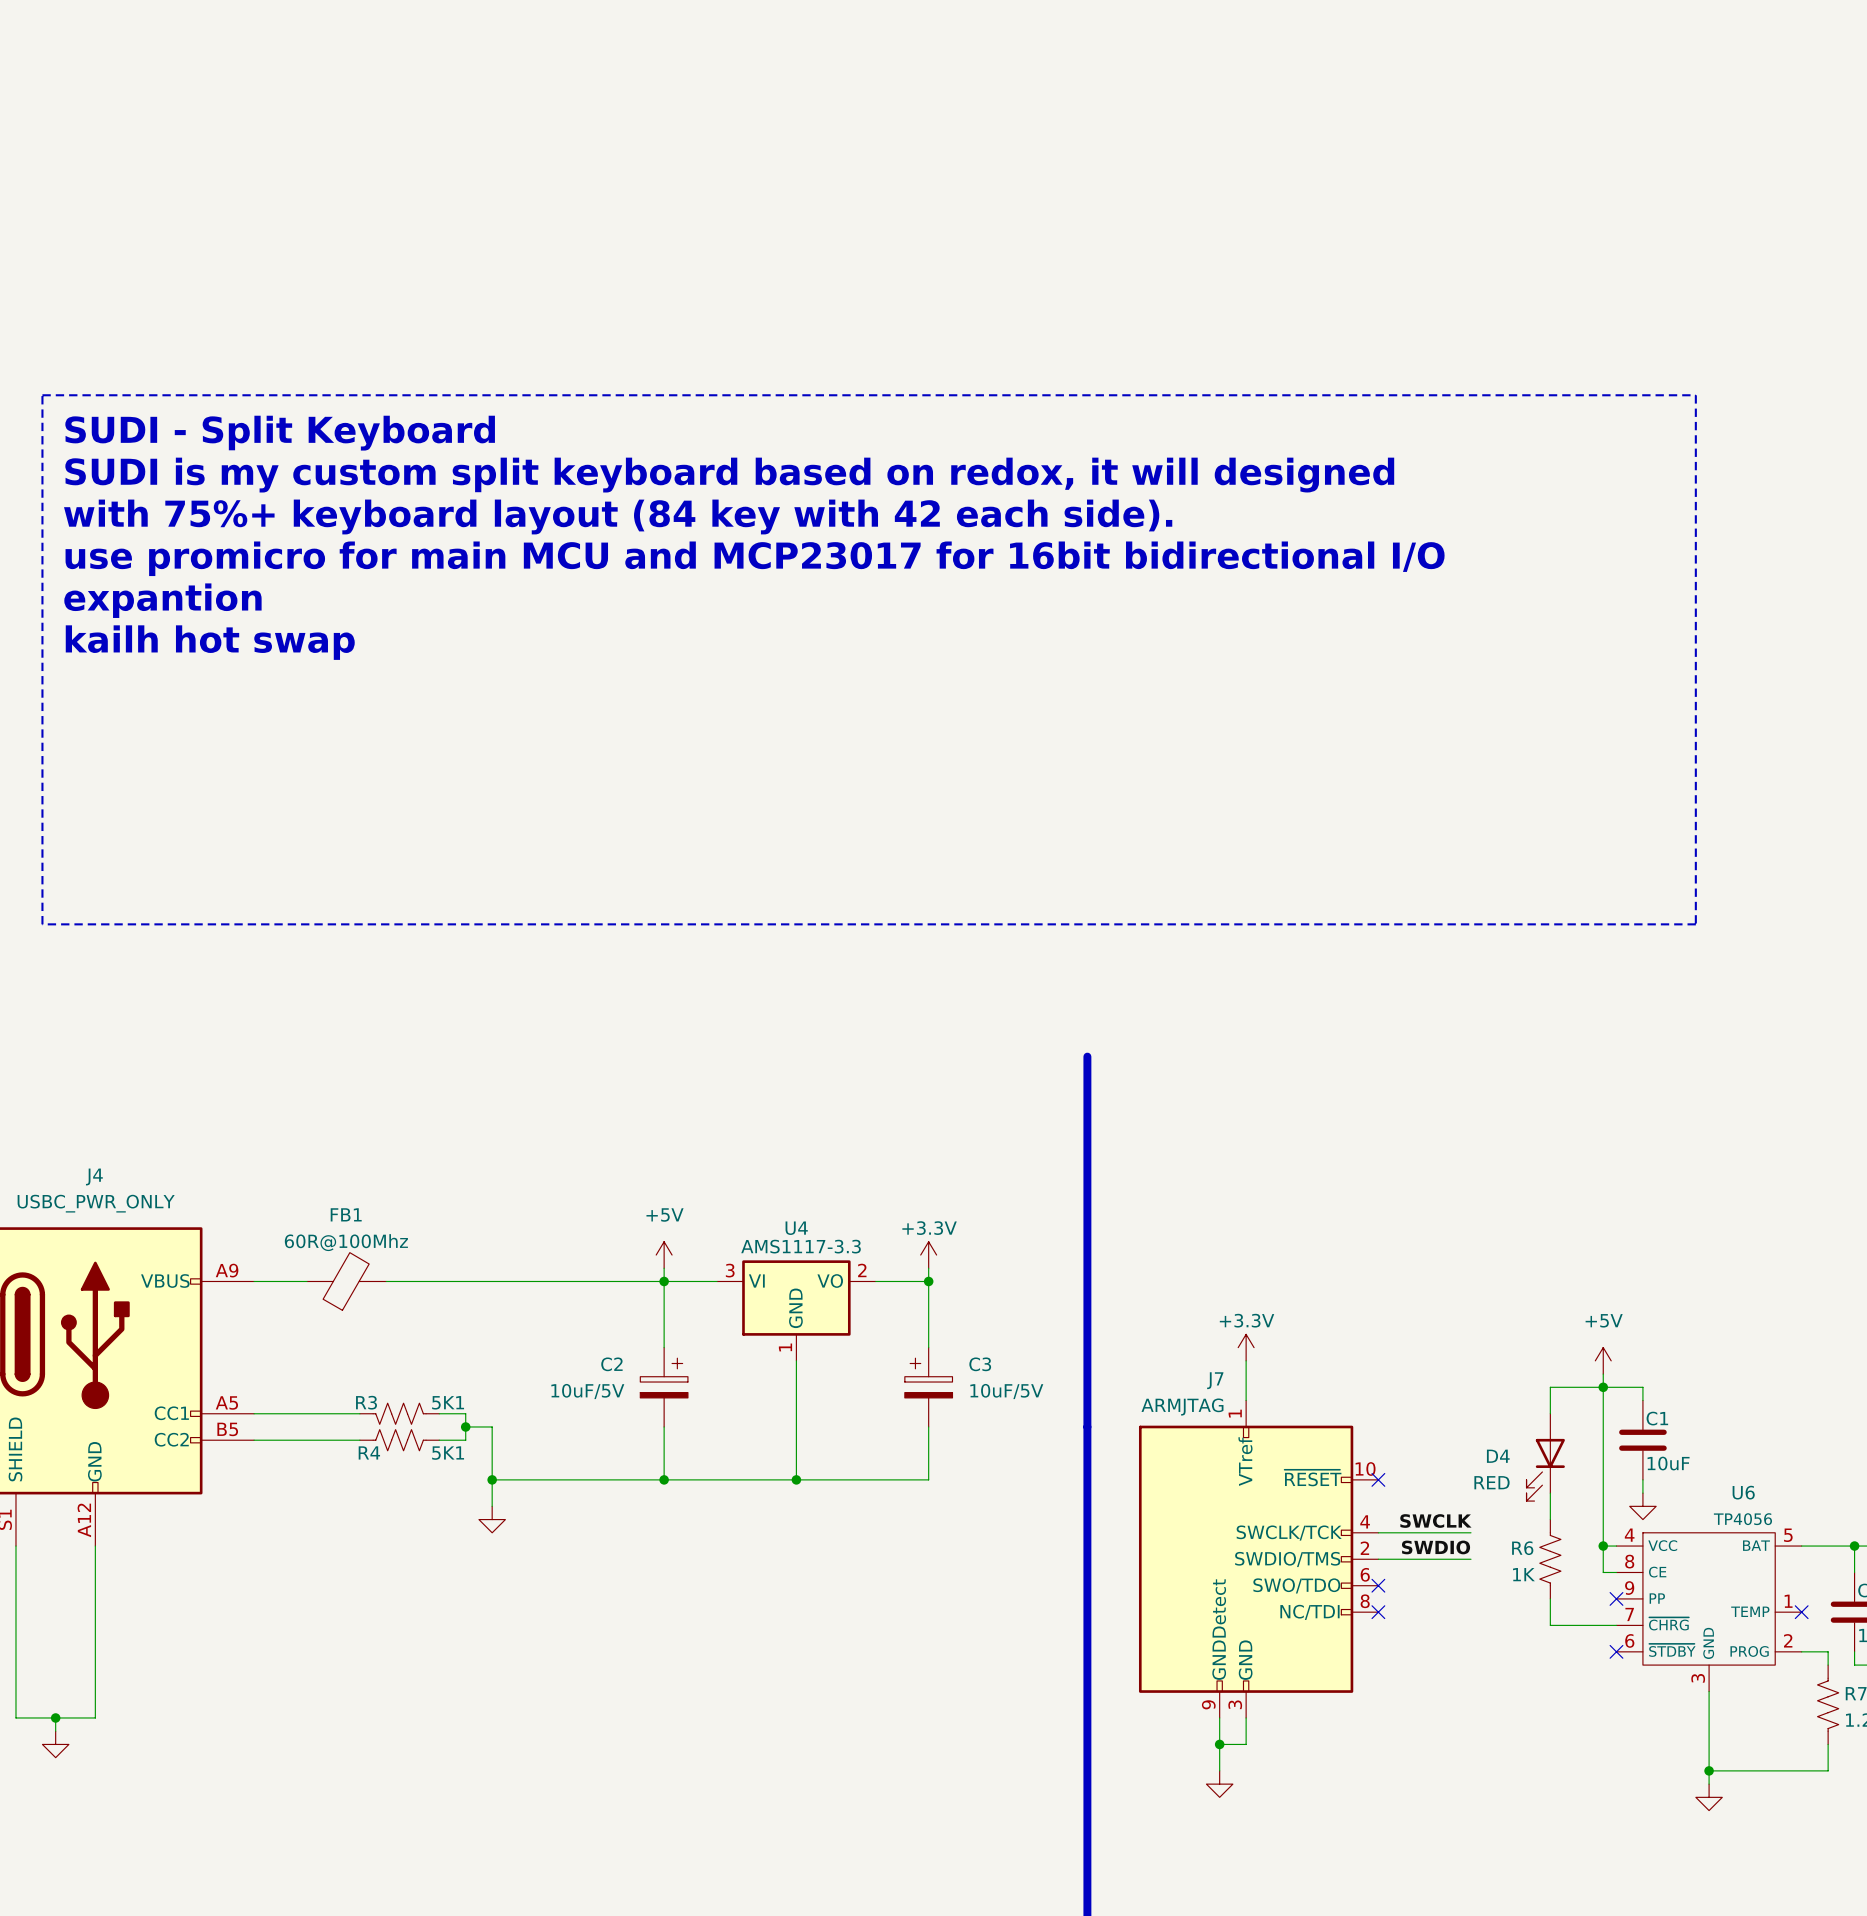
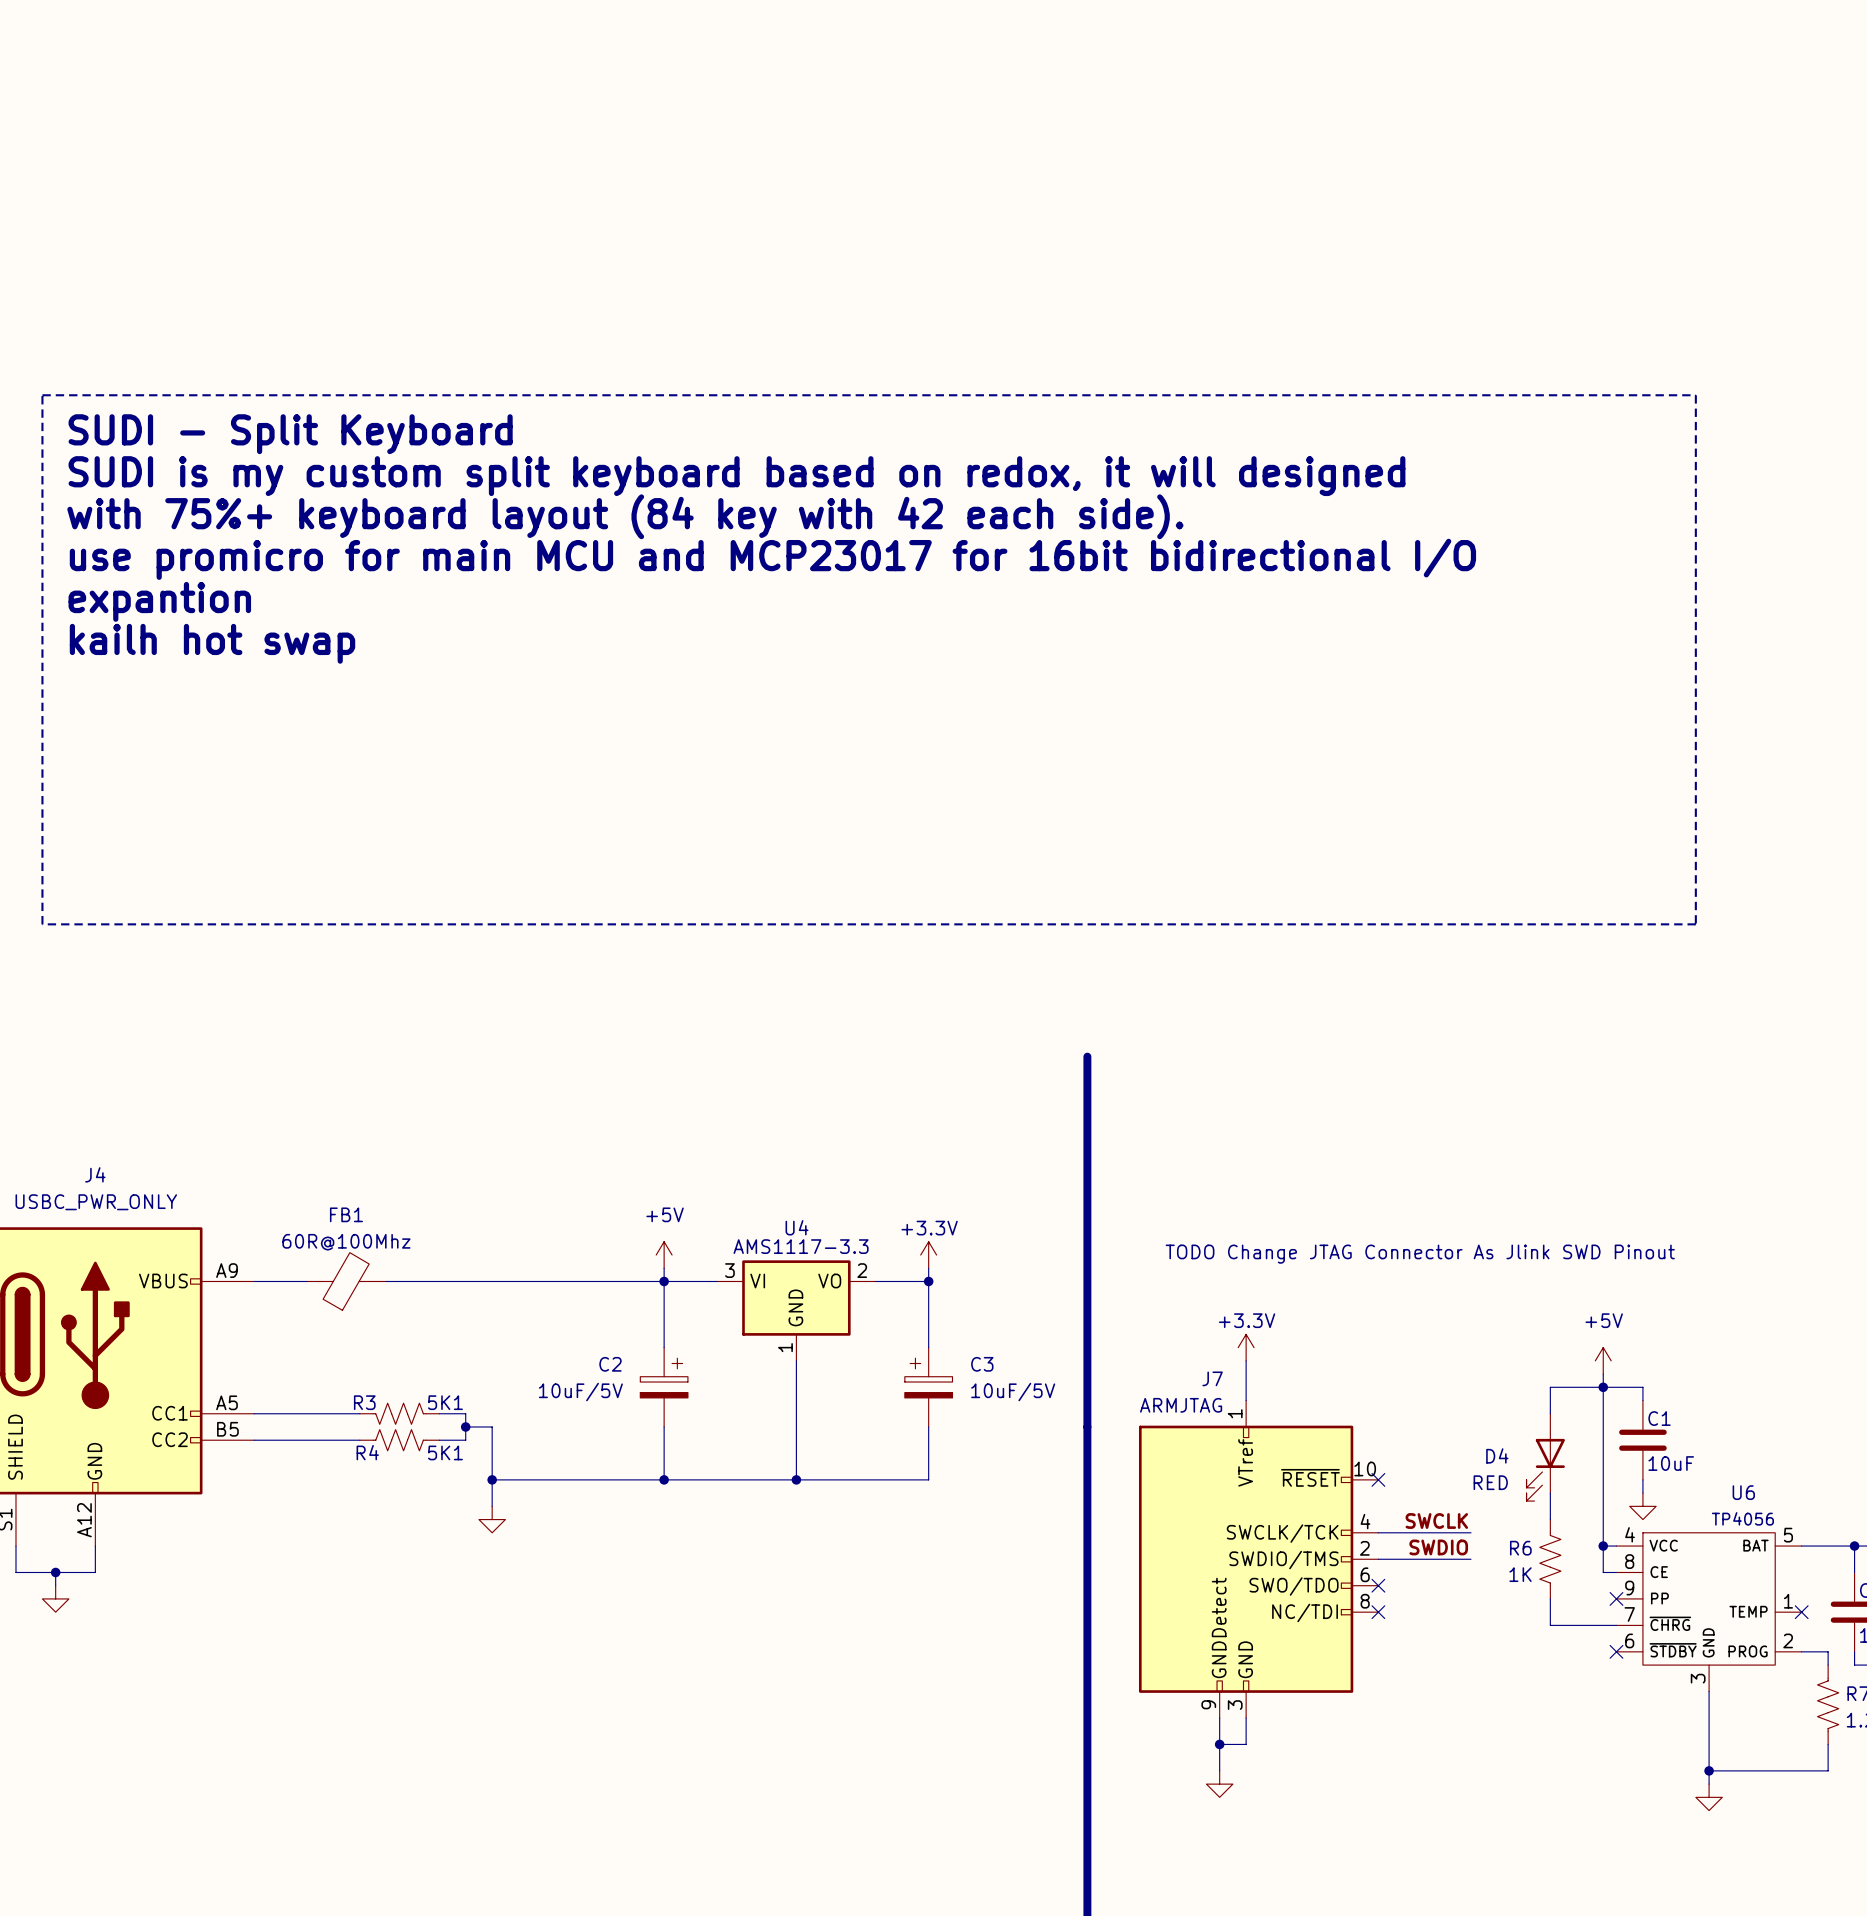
text: none -> TODO Change JTAG Connector As Jlink SWD Pinout (1420, 1254)
wire: (15, 1572) (15, 1717) (95, 1717) (95, 1572) -> (15, 1572) (95, 1572)
junction: none -> (55, 1572)
wire: (55, 1717) (55, 1731) -> (55, 1572) (55, 1585)
junction: (55, 1717) -> none
power symbol position: (55, 1744) -> (55, 1598)

